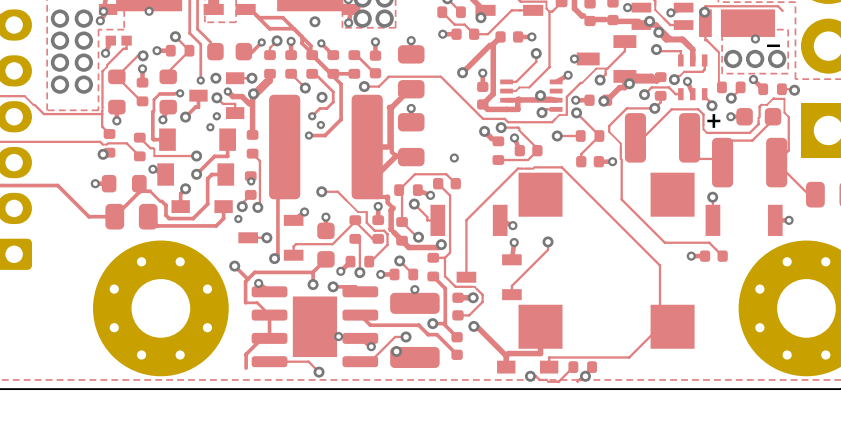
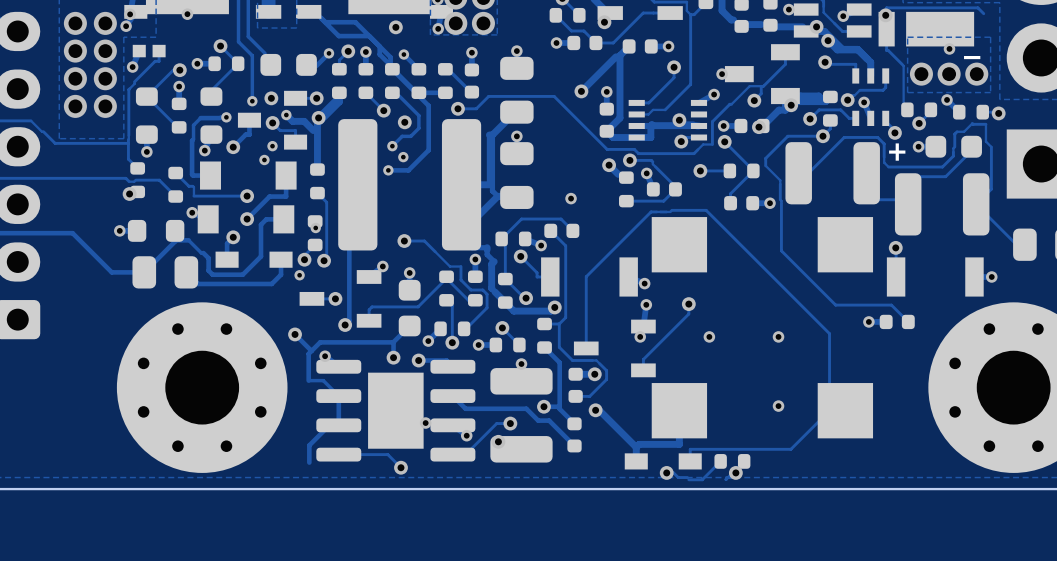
via: none -> (640, 336)
via: none -> (709, 336)
via: none -> (778, 336)
via: none -> (778, 406)

